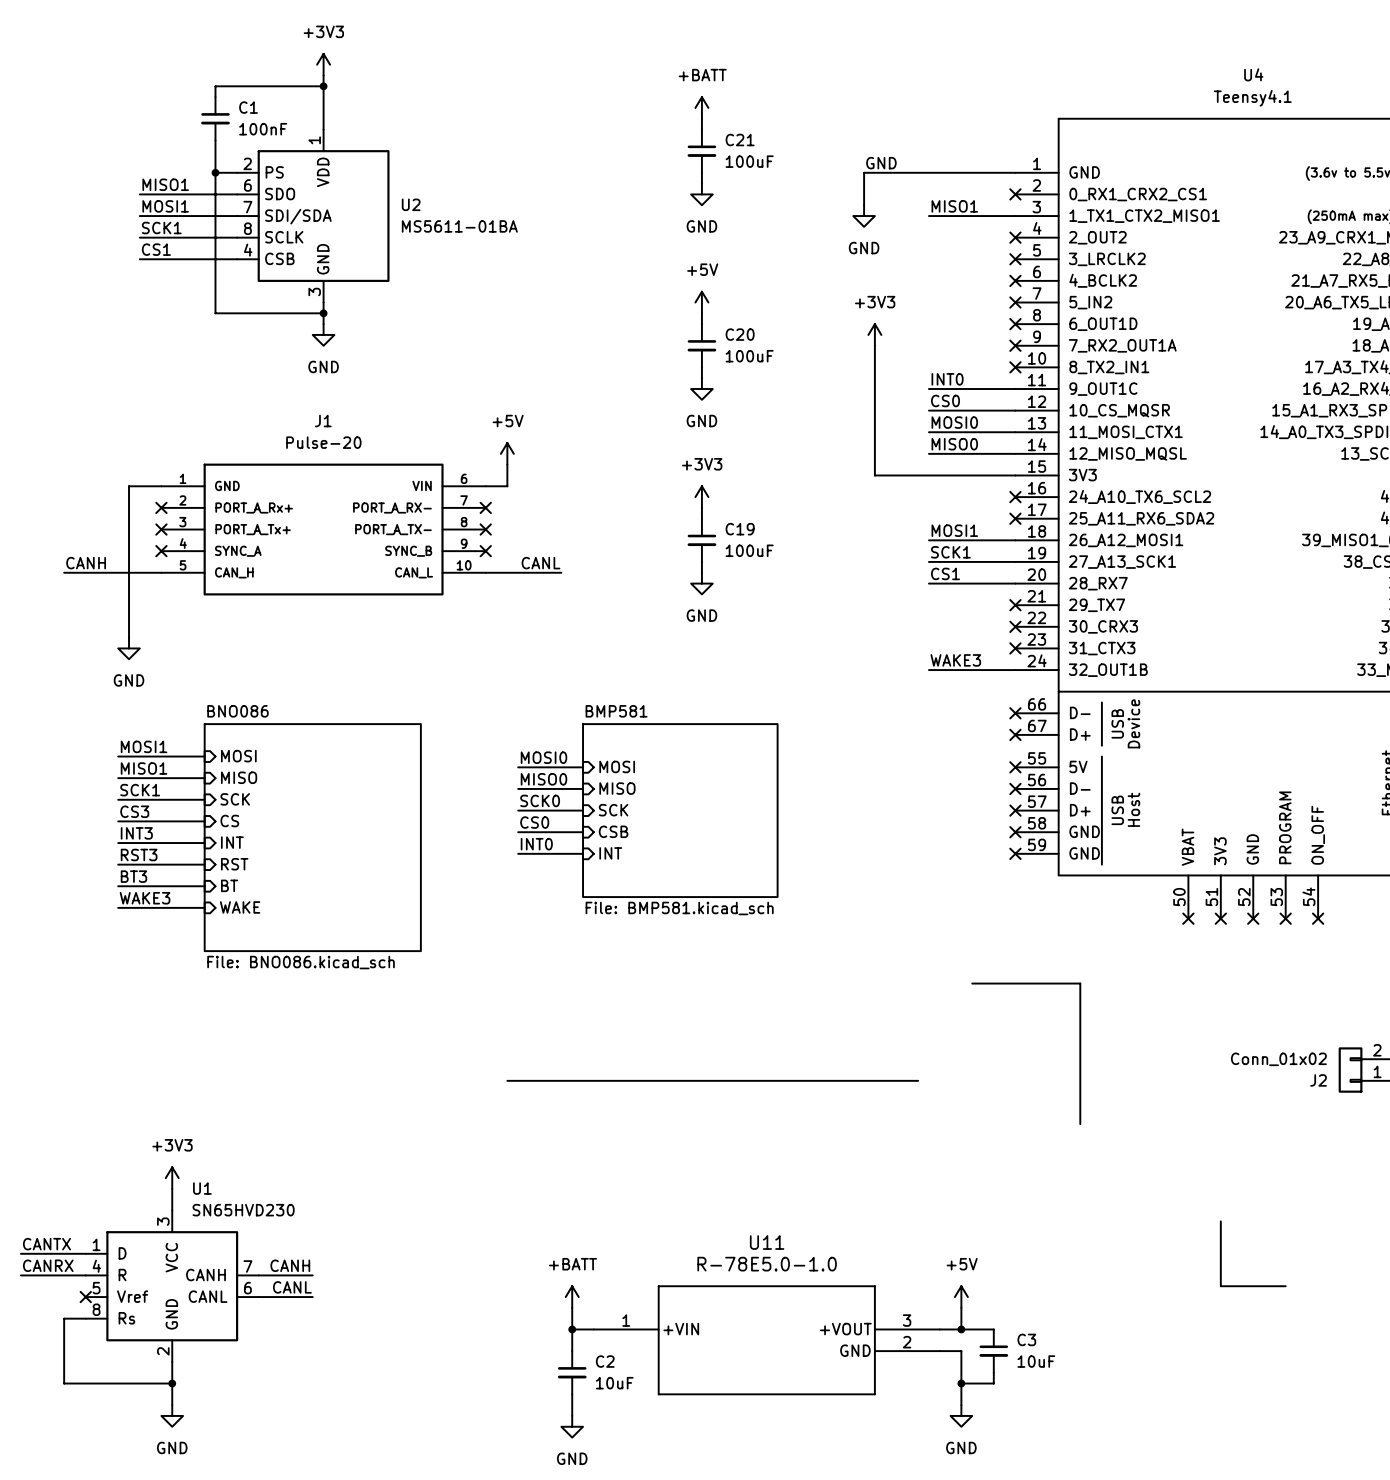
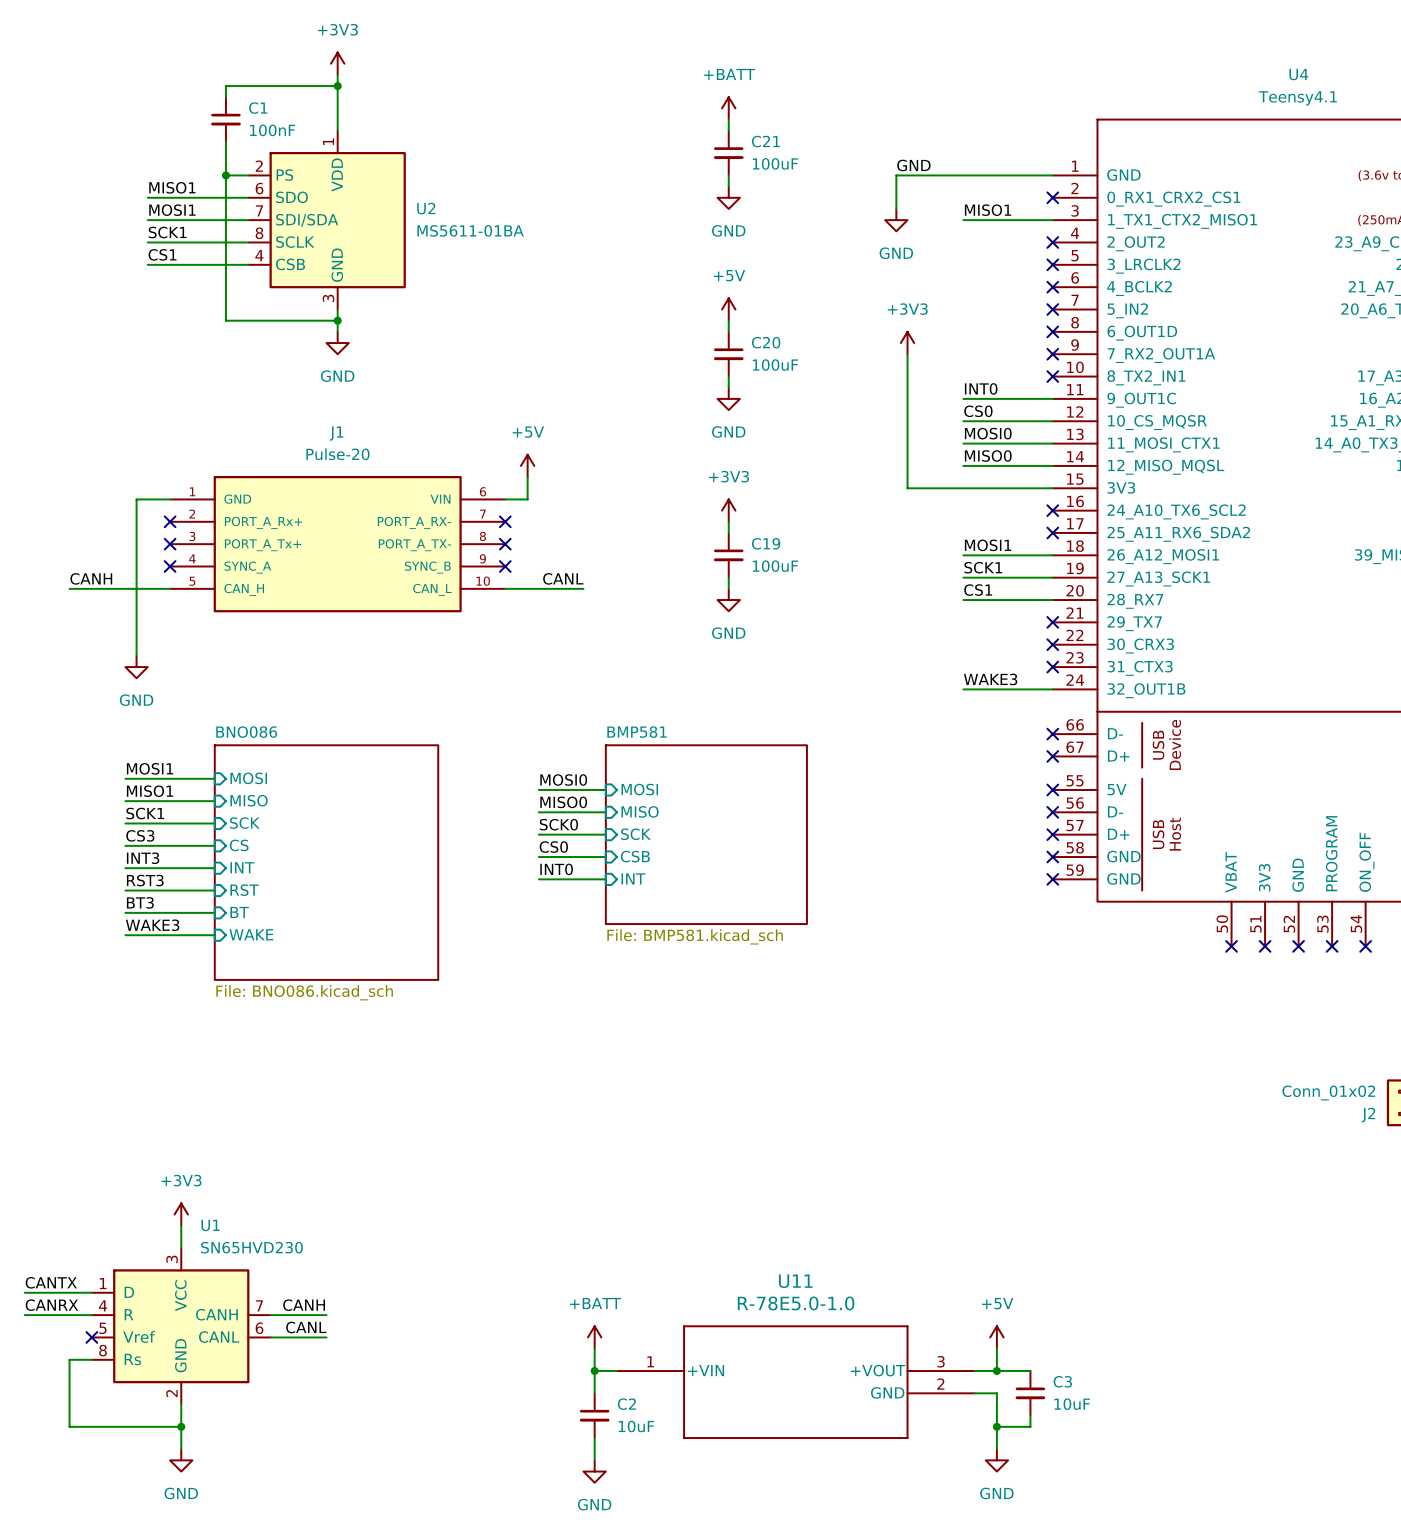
wire: (972, 983) (1080, 983) (1080, 1124) -> none
wire: (507, 1080) (918, 1080) -> none
wire: (1220, 1221) (1220, 1286) (1285, 1286) -> none

